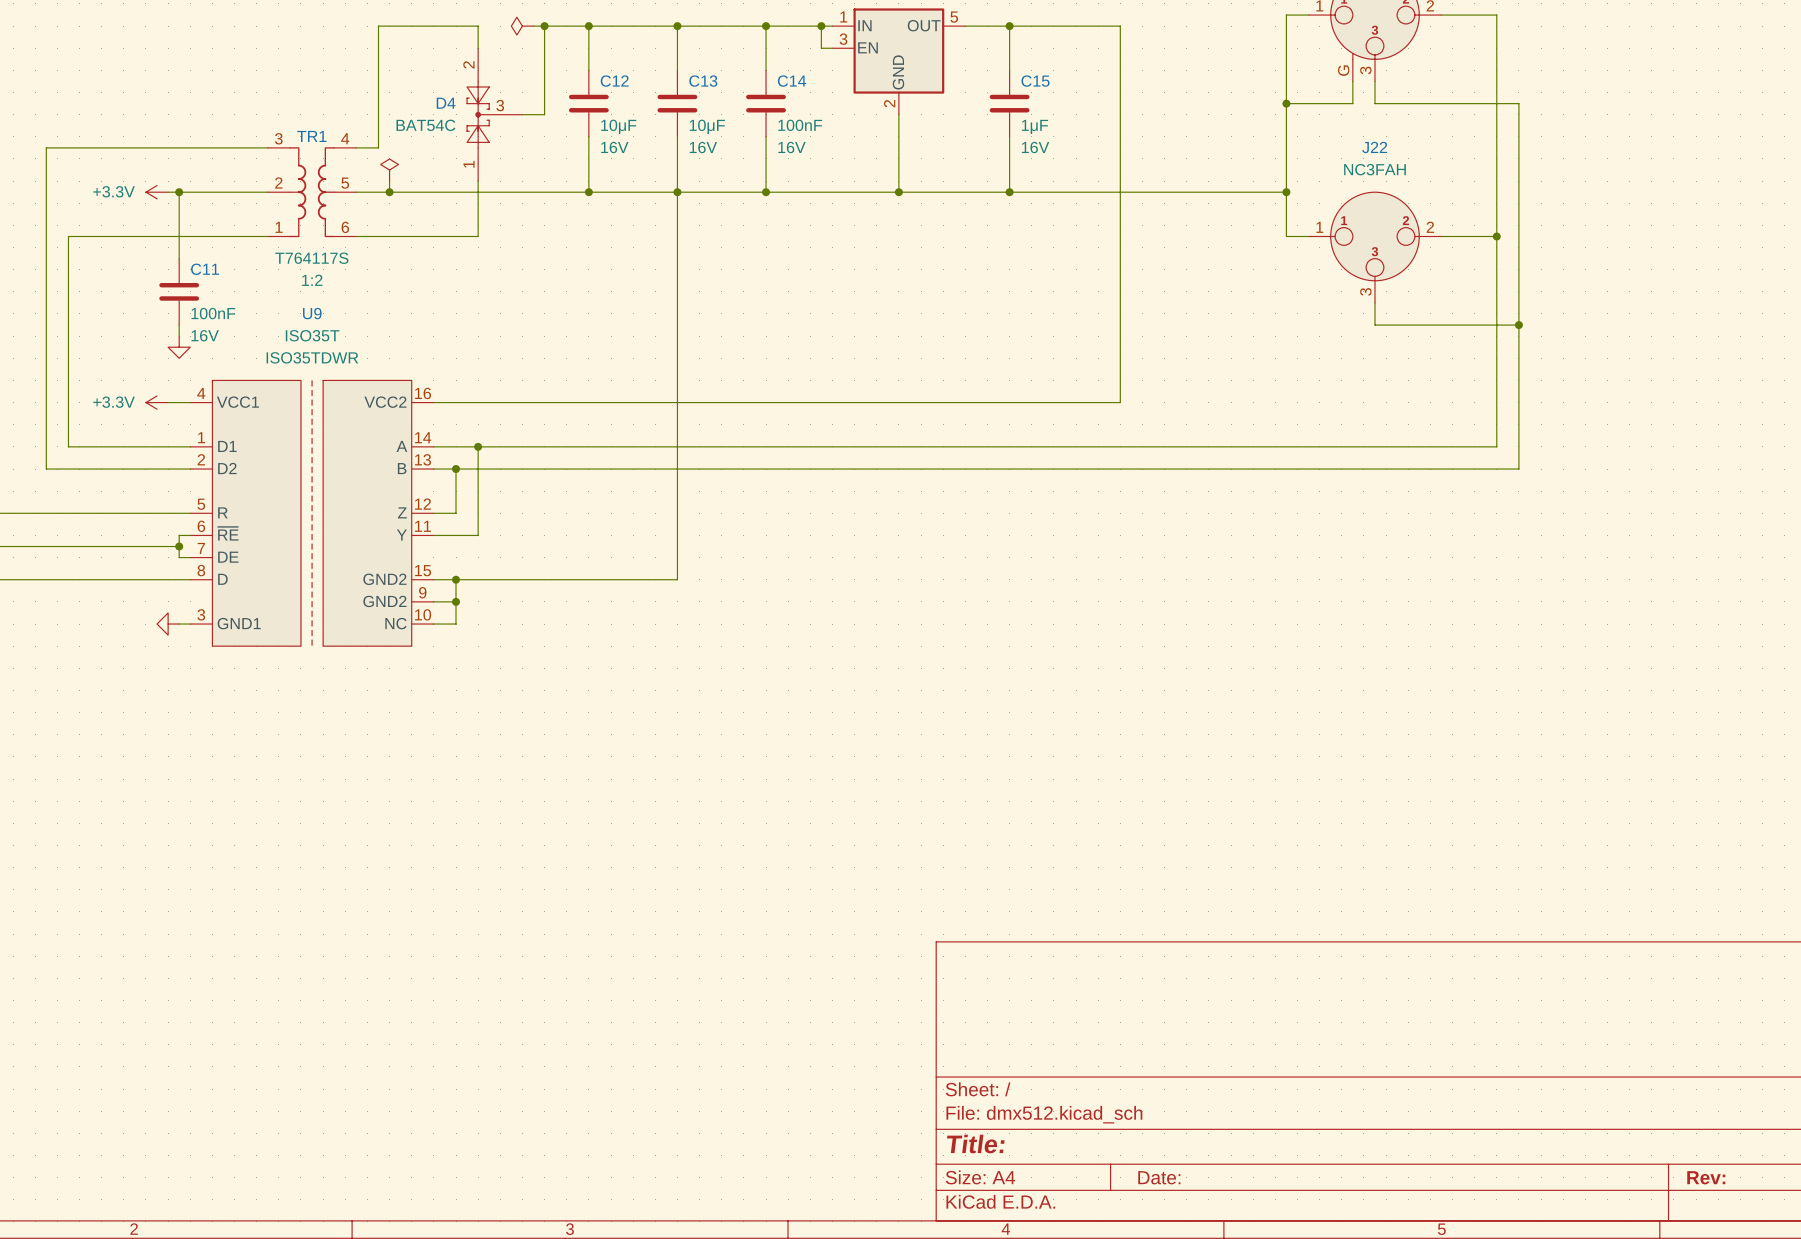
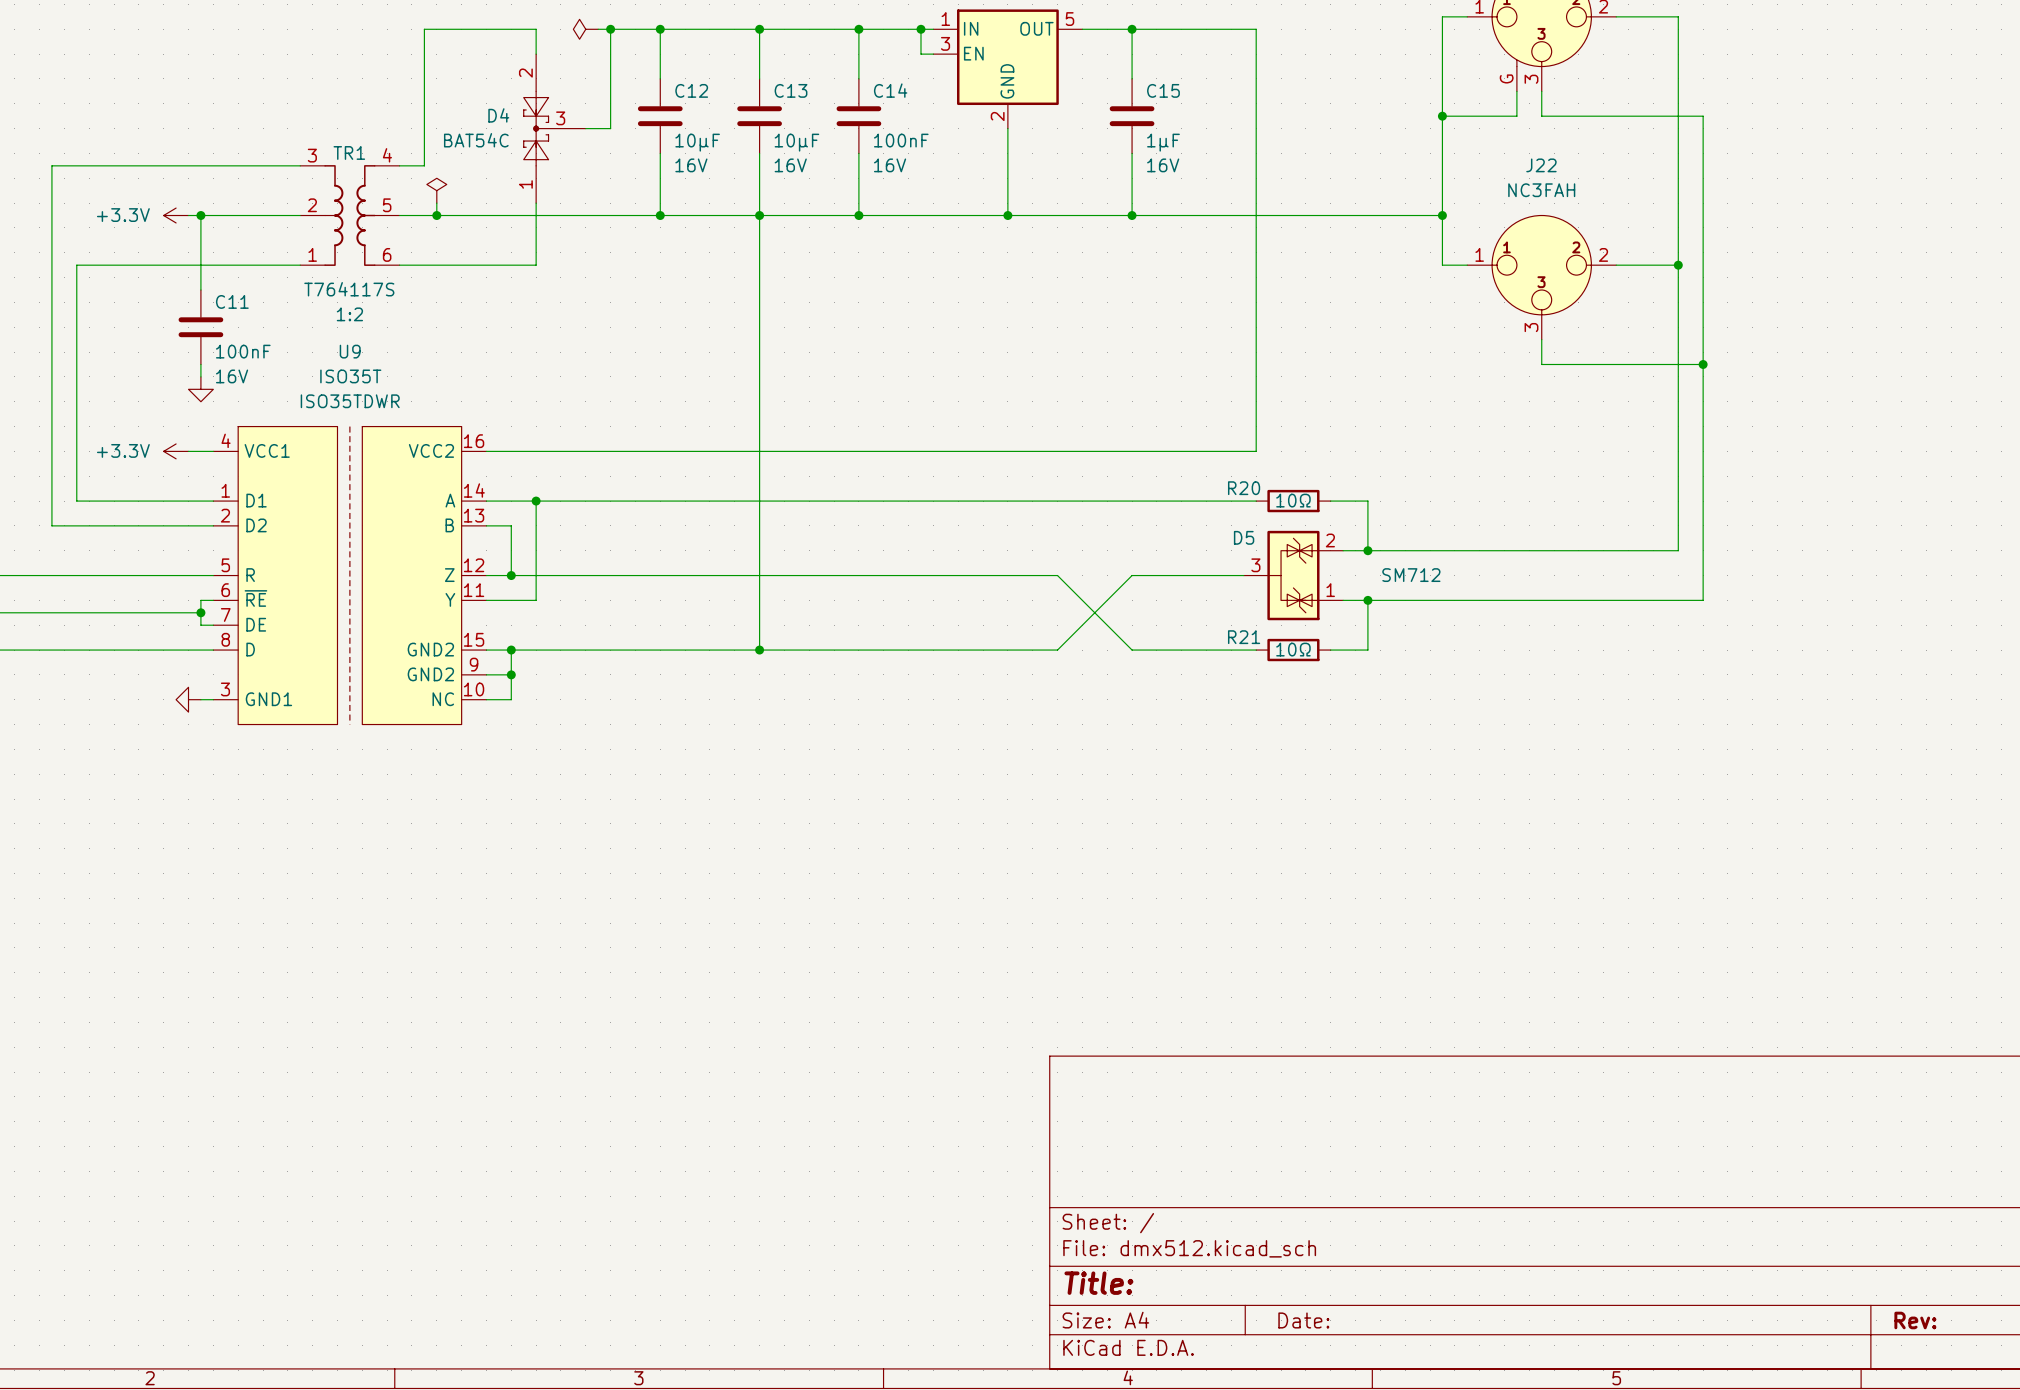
wire: (1120, 446) (1186, 446) -> none
R20: none -> 10Ω (1293, 501)
wire: (1219, 446) (1496, 446) -> (1343, 550) (1678, 550) (1678, 501)
wire: none -> (1367, 501) (1367, 550)
wire: (456, 469) (1518, 469) -> (1343, 600) (1703, 600) (1703, 525)
junction position: (456, 469) -> (511, 575)
junction: none -> (1367, 550)
wire: none -> (511, 575) (1057, 575) (1132, 650) (1256, 650)
wire: none -> (1243, 575) (1132, 575) (1057, 650) (759, 650)
D5: none -> SM712 (1293, 575)
wire: none -> (1367, 600) (1367, 650) (1330, 650)
junction: none -> (1367, 600)
junction: none -> (759, 650)
R21: none -> 10Ω (1293, 650)

